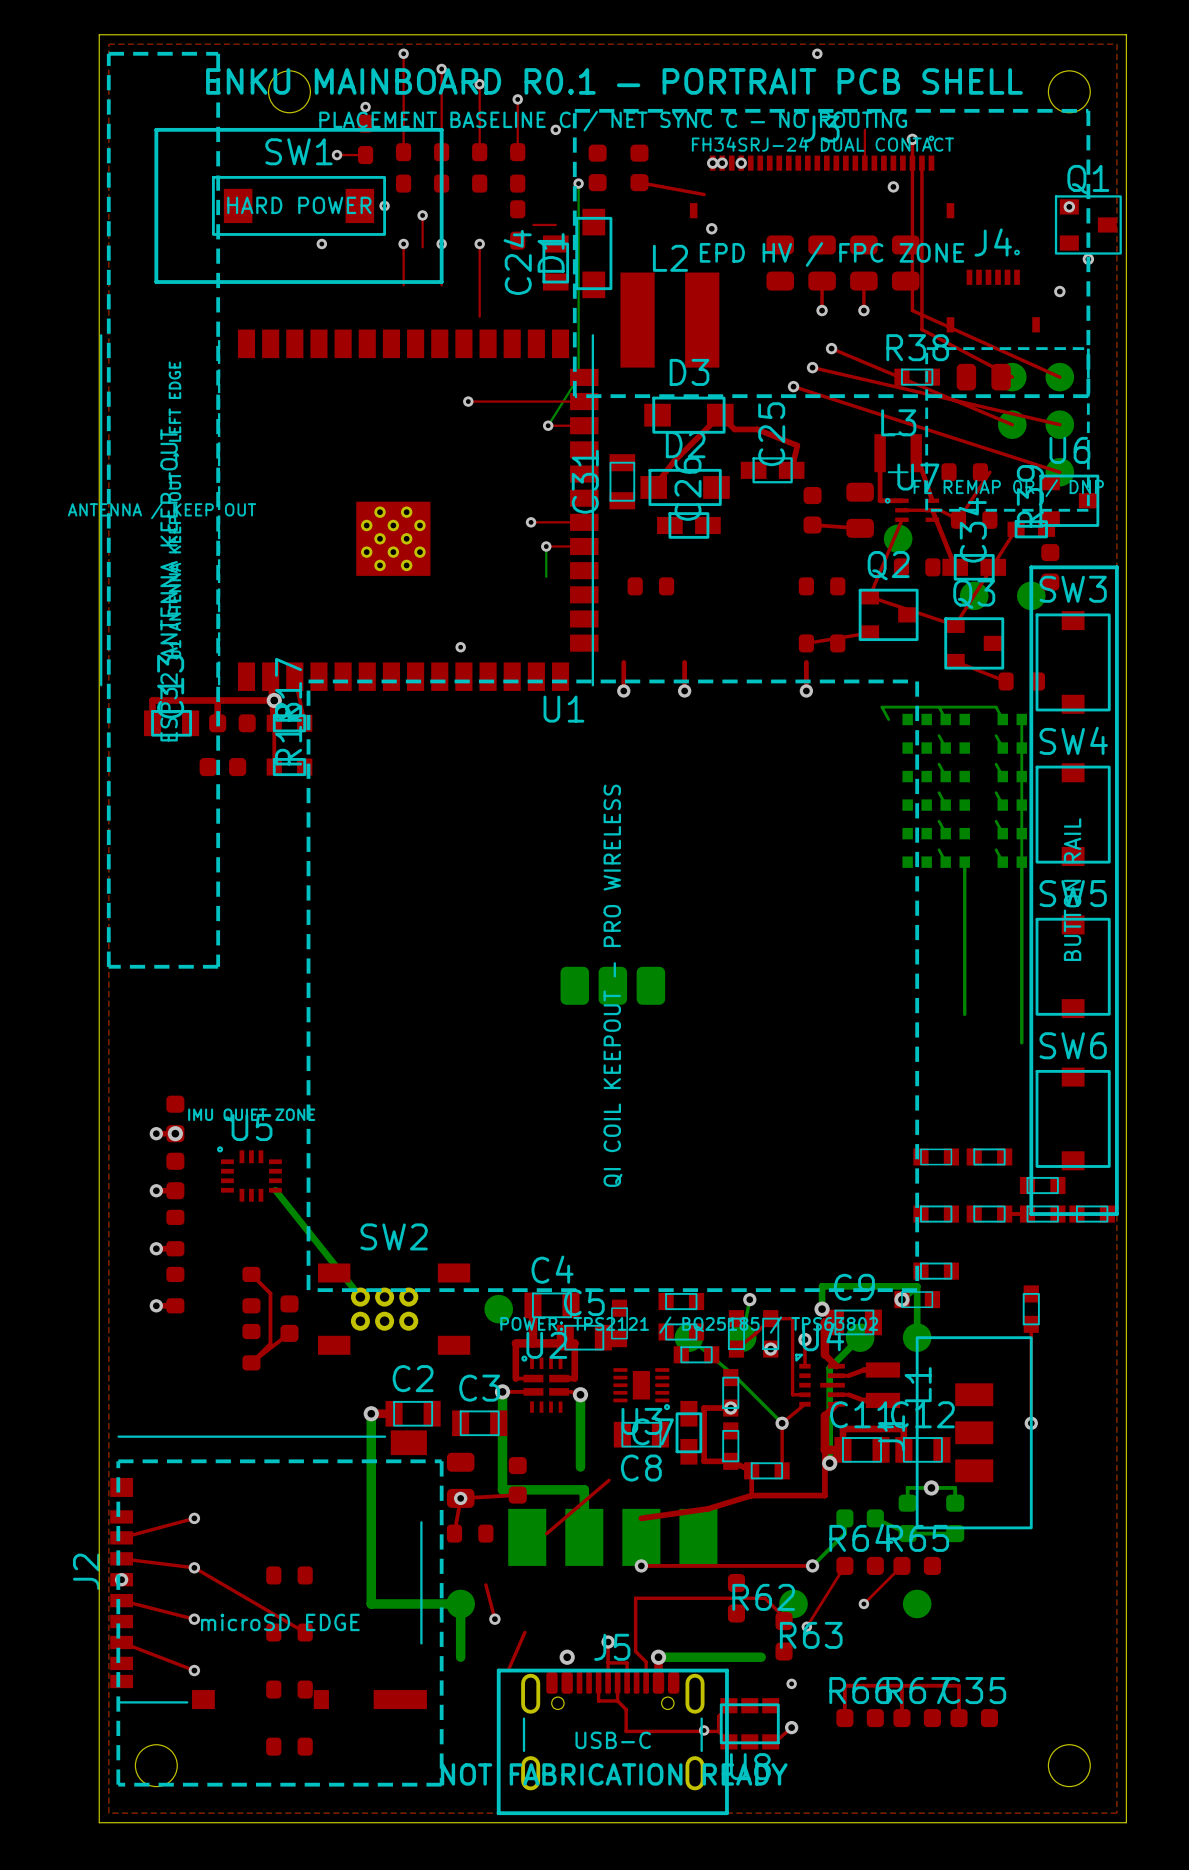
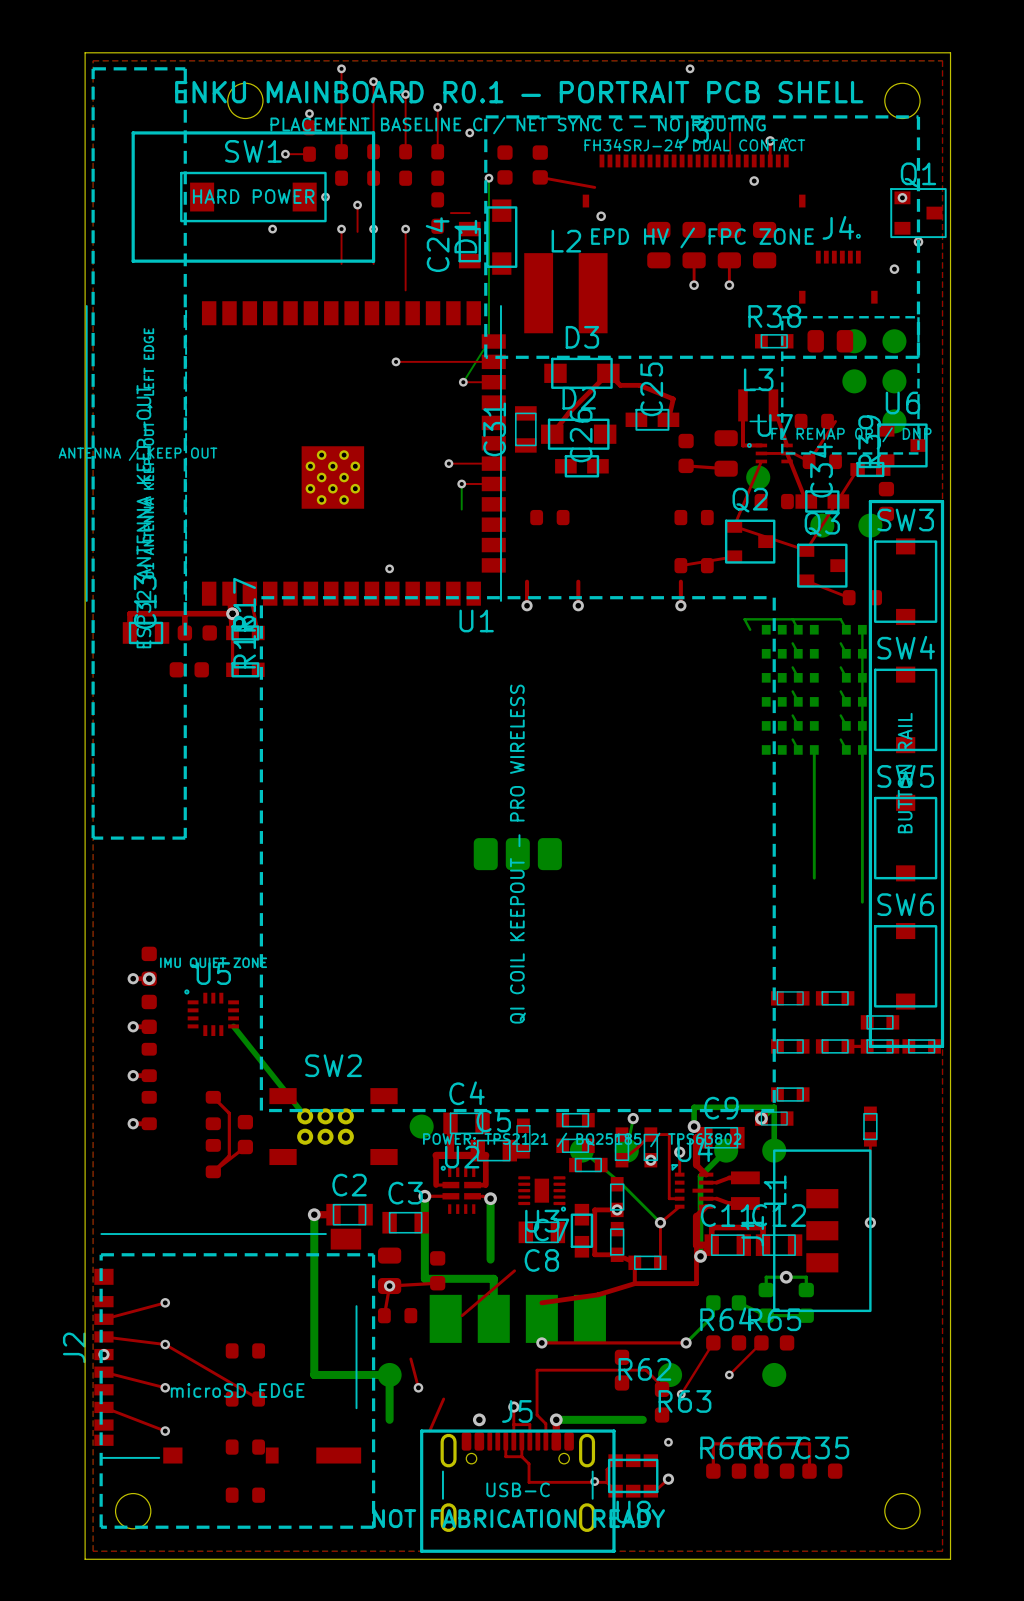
via: (712, 163) -> none
via: (722, 163) -> none
via: (741, 163) -> none
top track: (912, 163) (912, 310) (1059, 377) -> none
top track: (921, 163) (921, 329) (1012, 377) -> none
top track: (831, 348) (1012, 424) -> none
via: (831, 348) -> none
top track: (812, 367) (1059, 424) -> none
via: (812, 367) -> none
top track: (793, 386) (1059, 472) -> none
via: (793, 386) -> none

